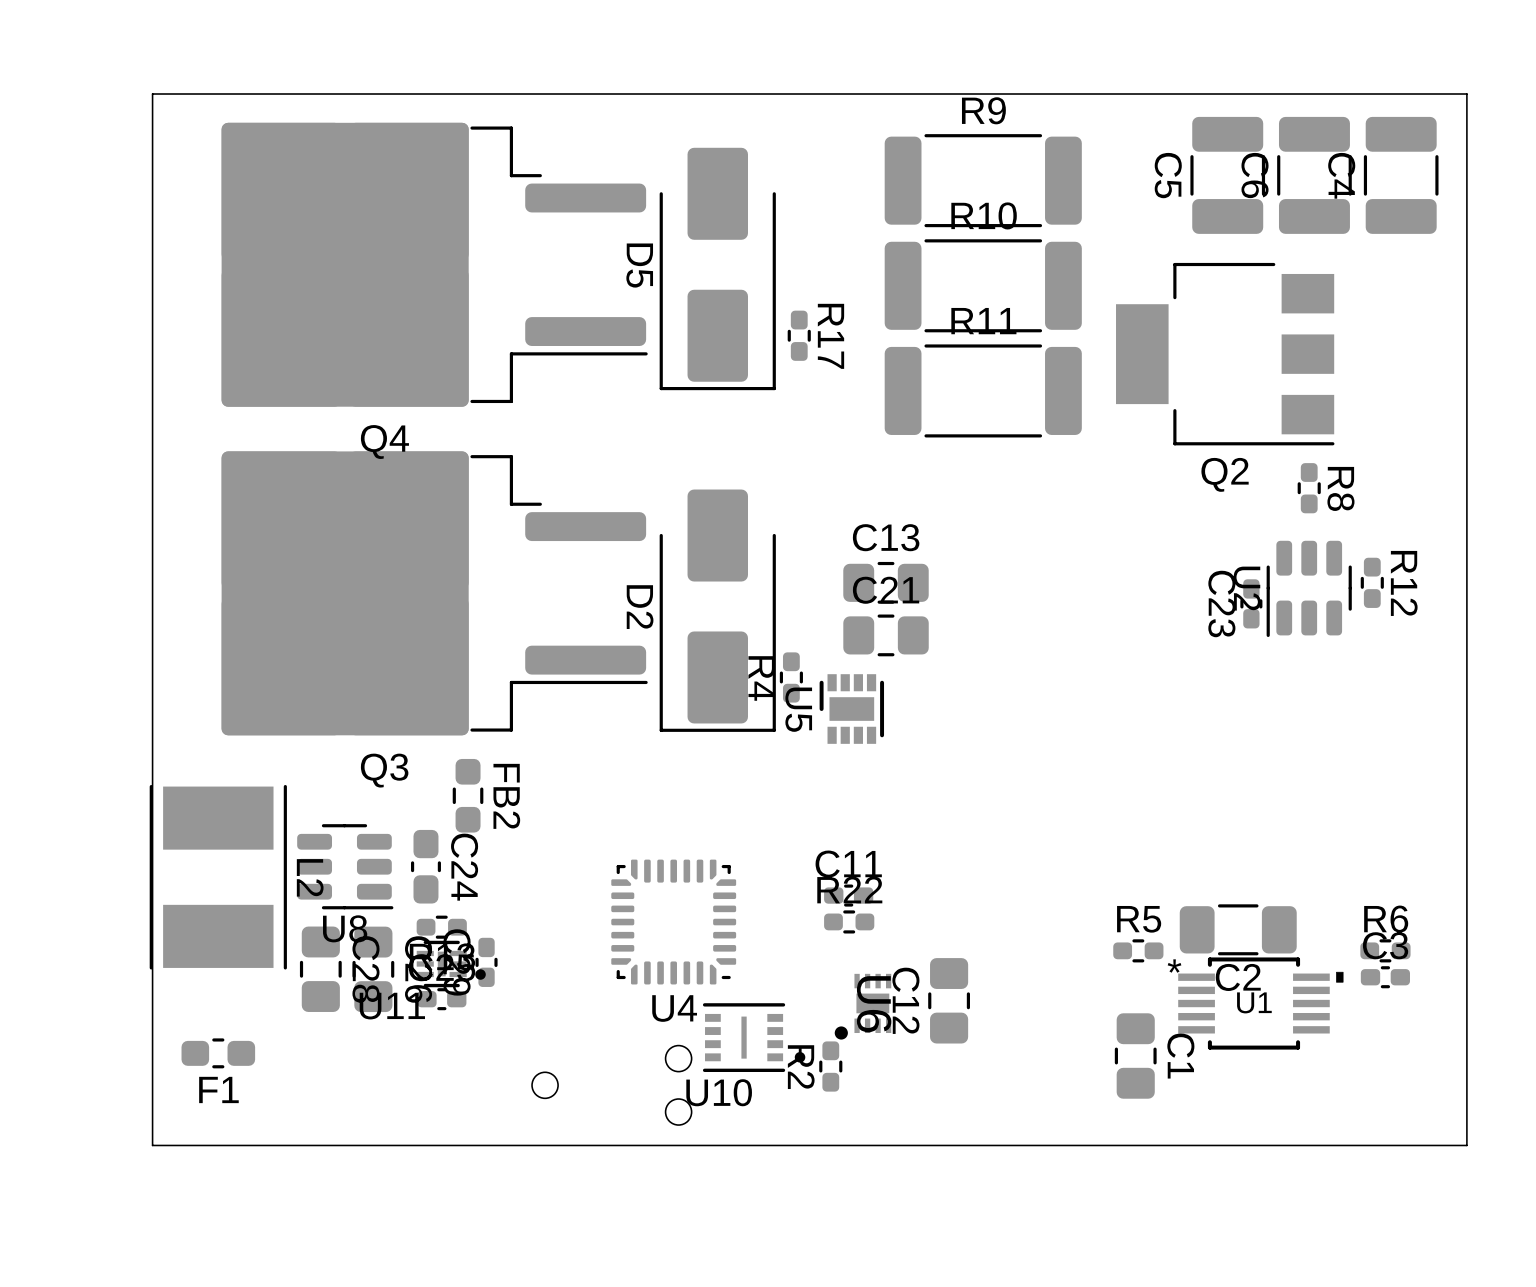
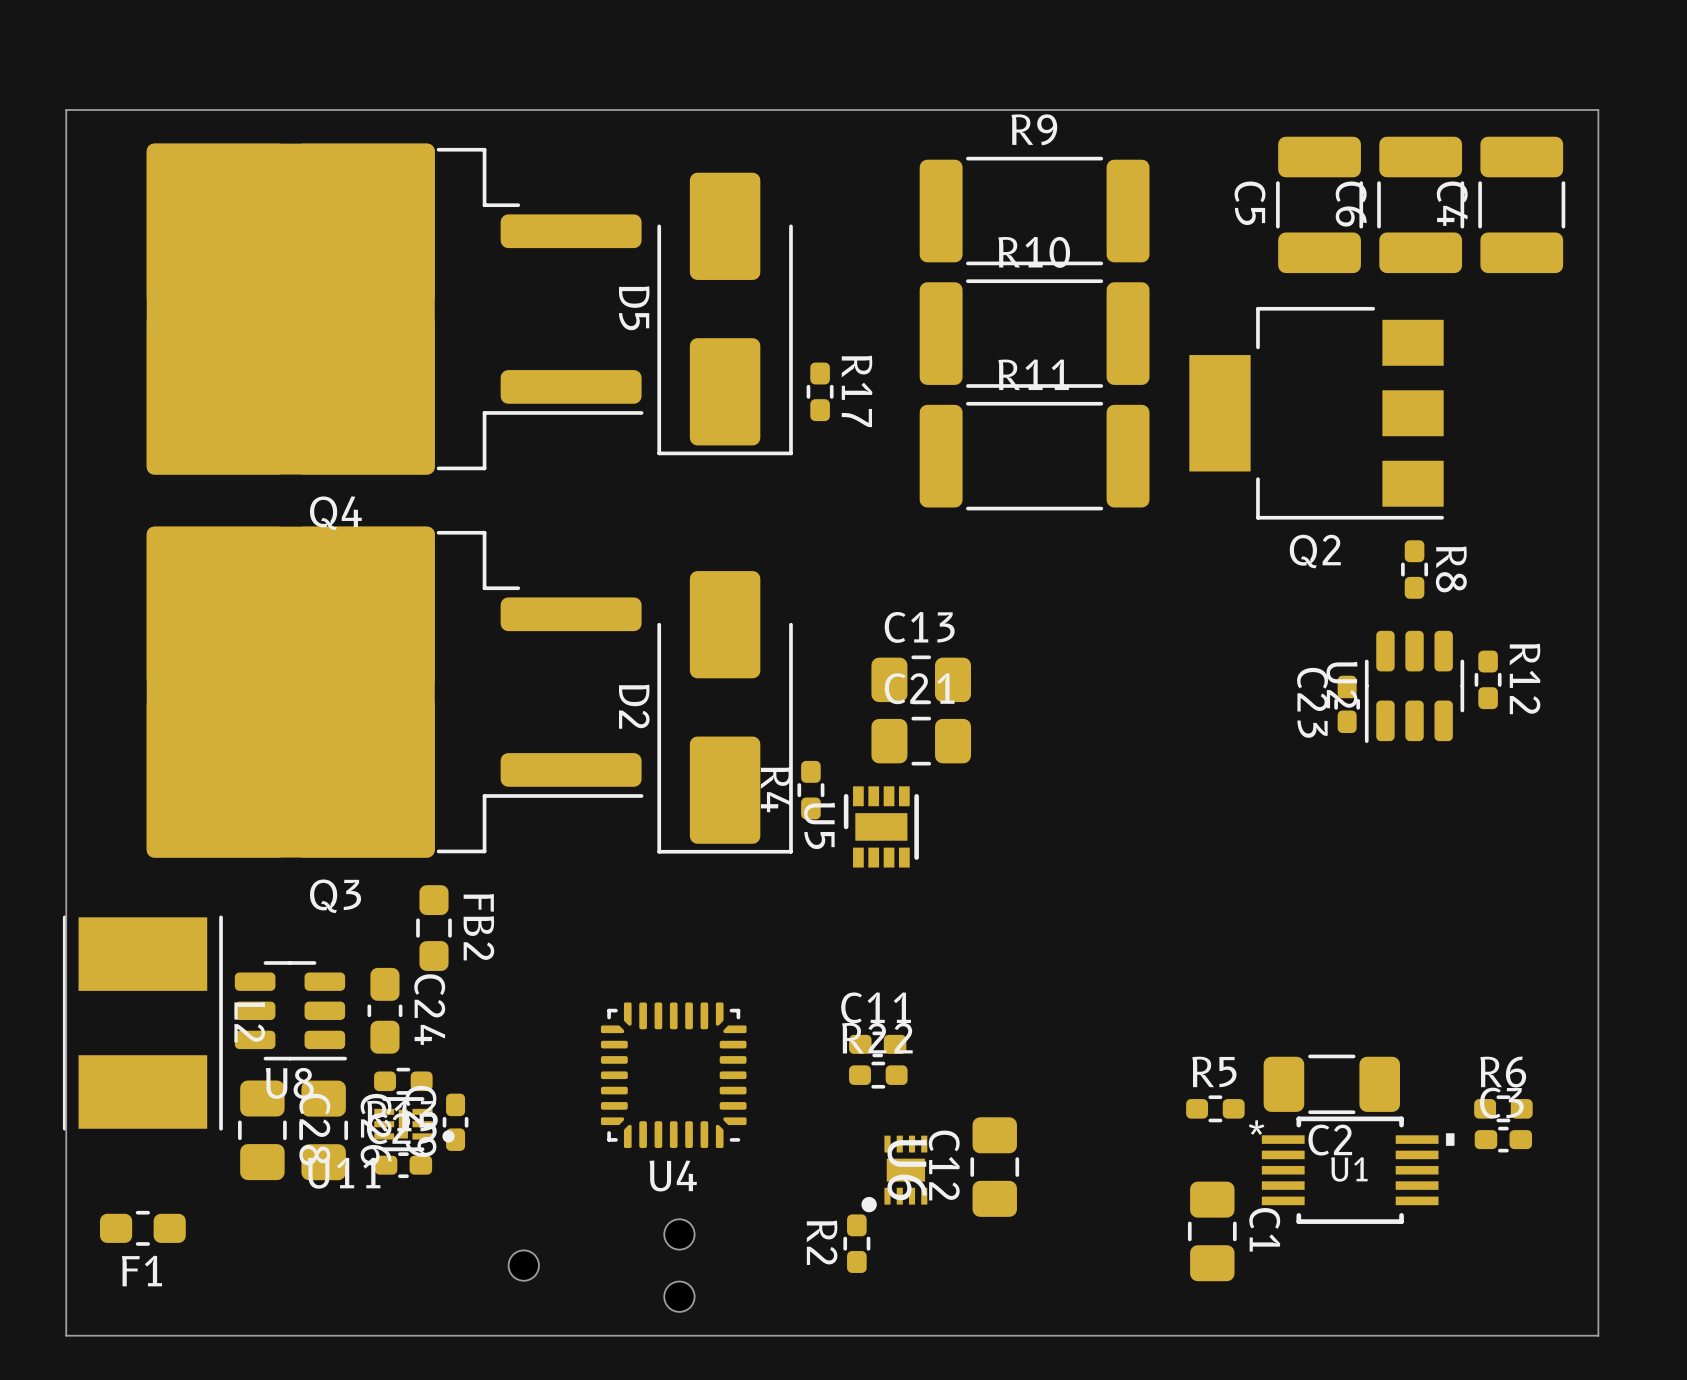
U10: (754, 1037) -> none

